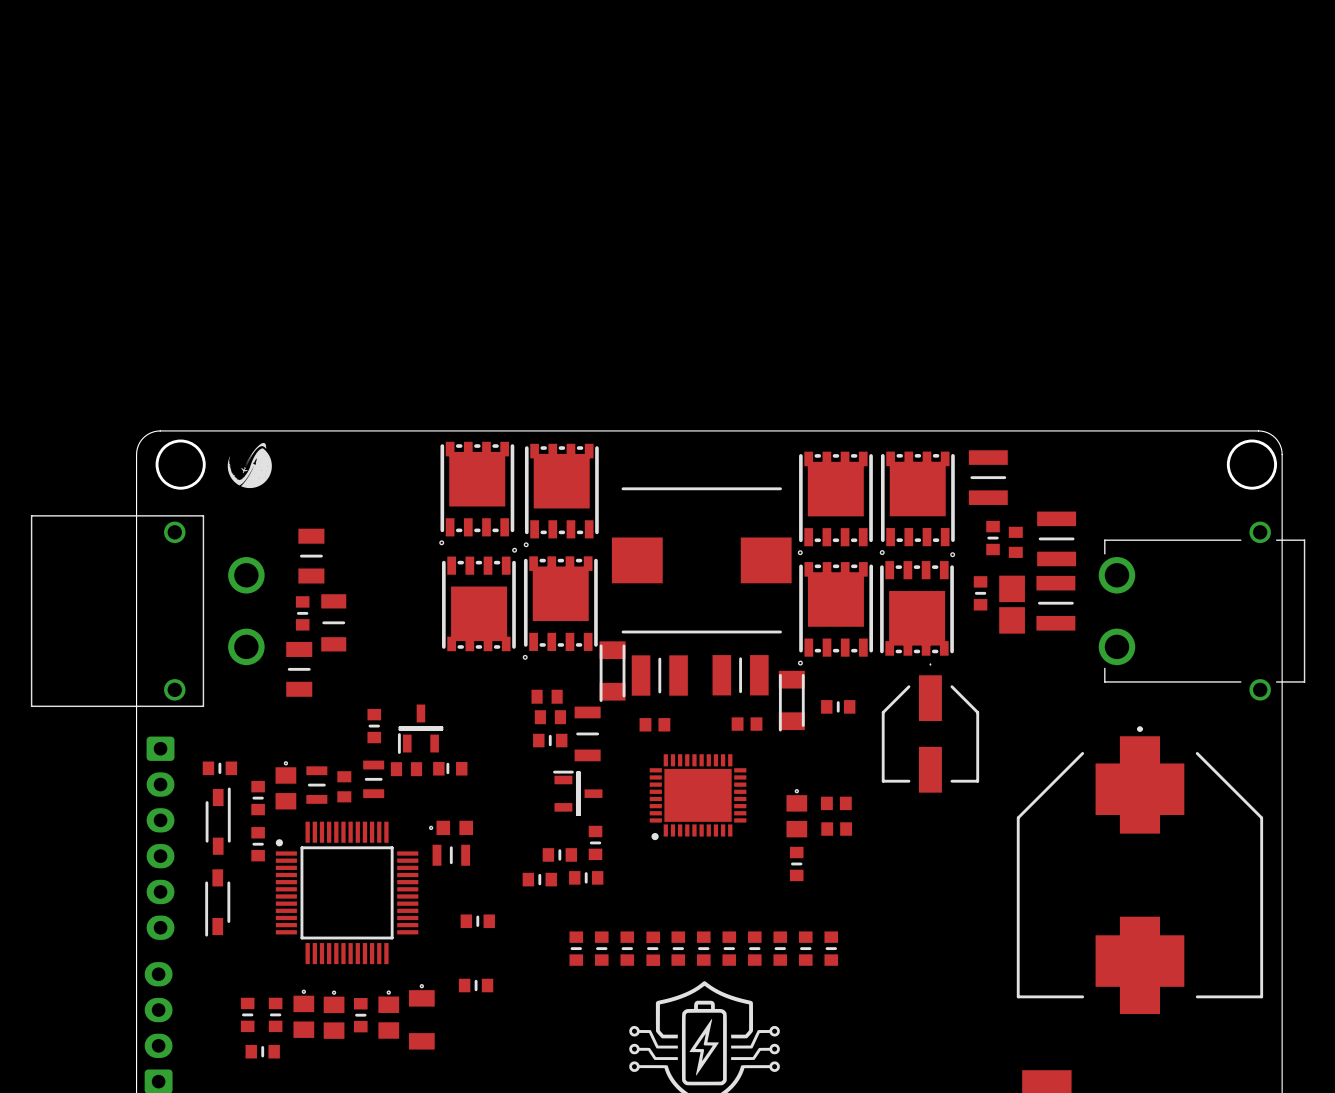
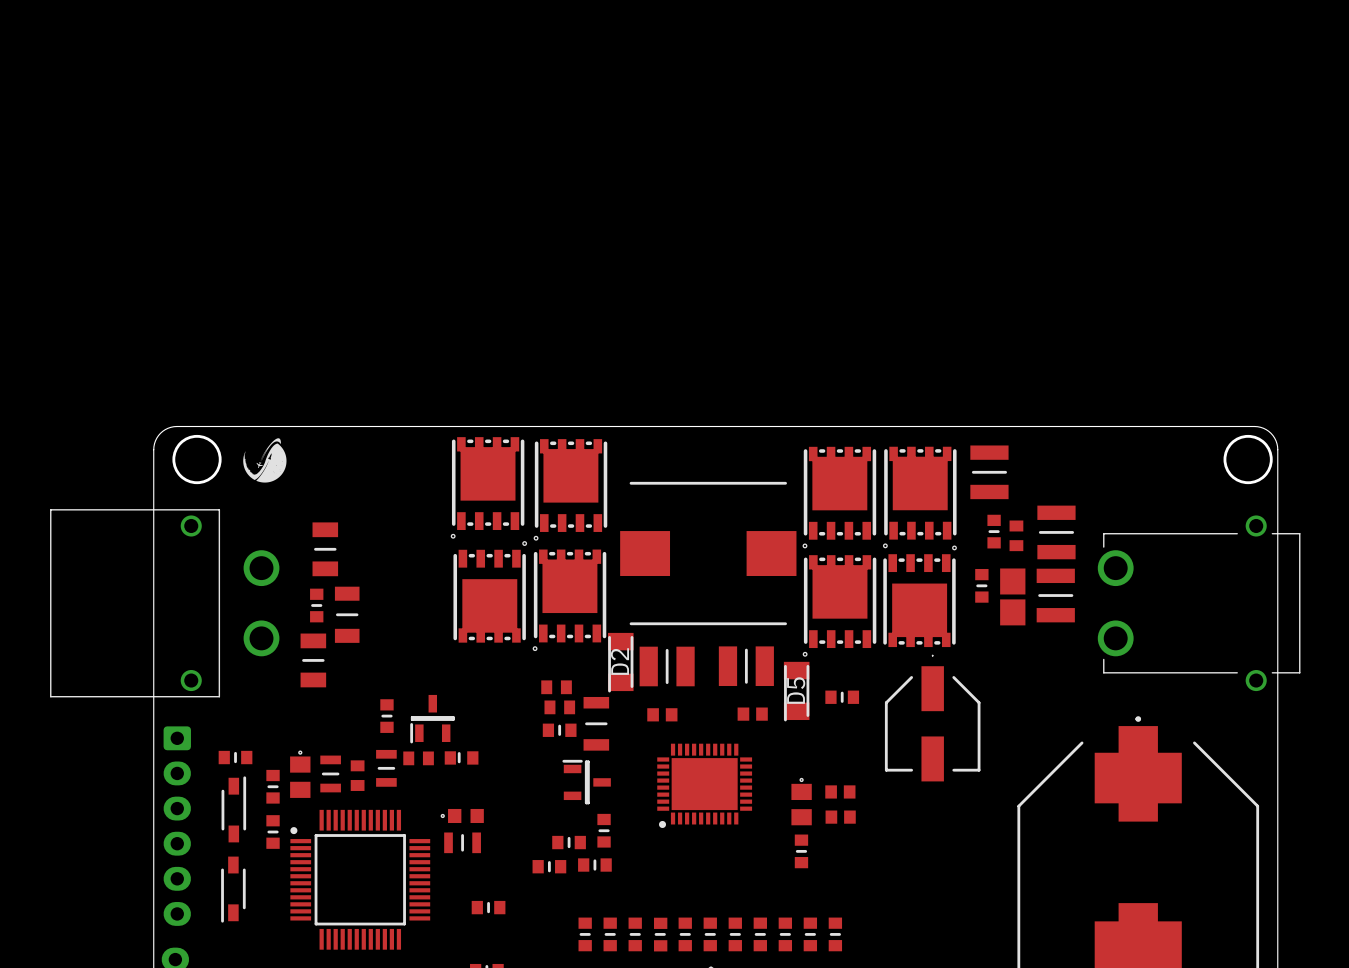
D2 name: none -> D2 (619, 661)
D5 name: none -> D5 (796, 690)

